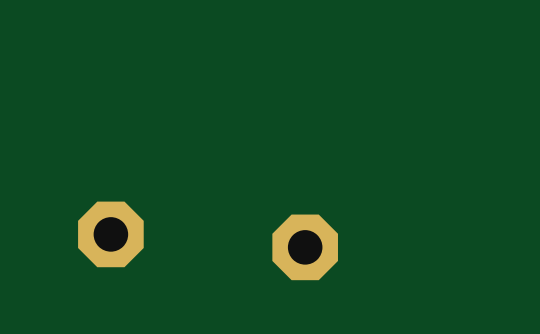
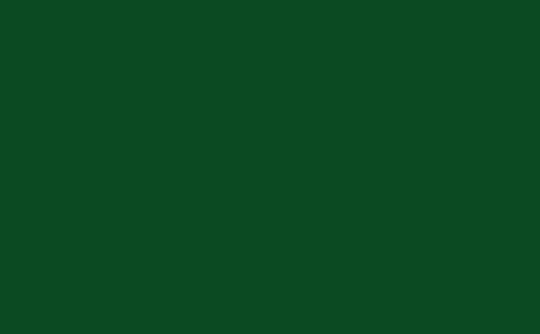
part: (110, 234) -> none
part: (305, 247) -> none

